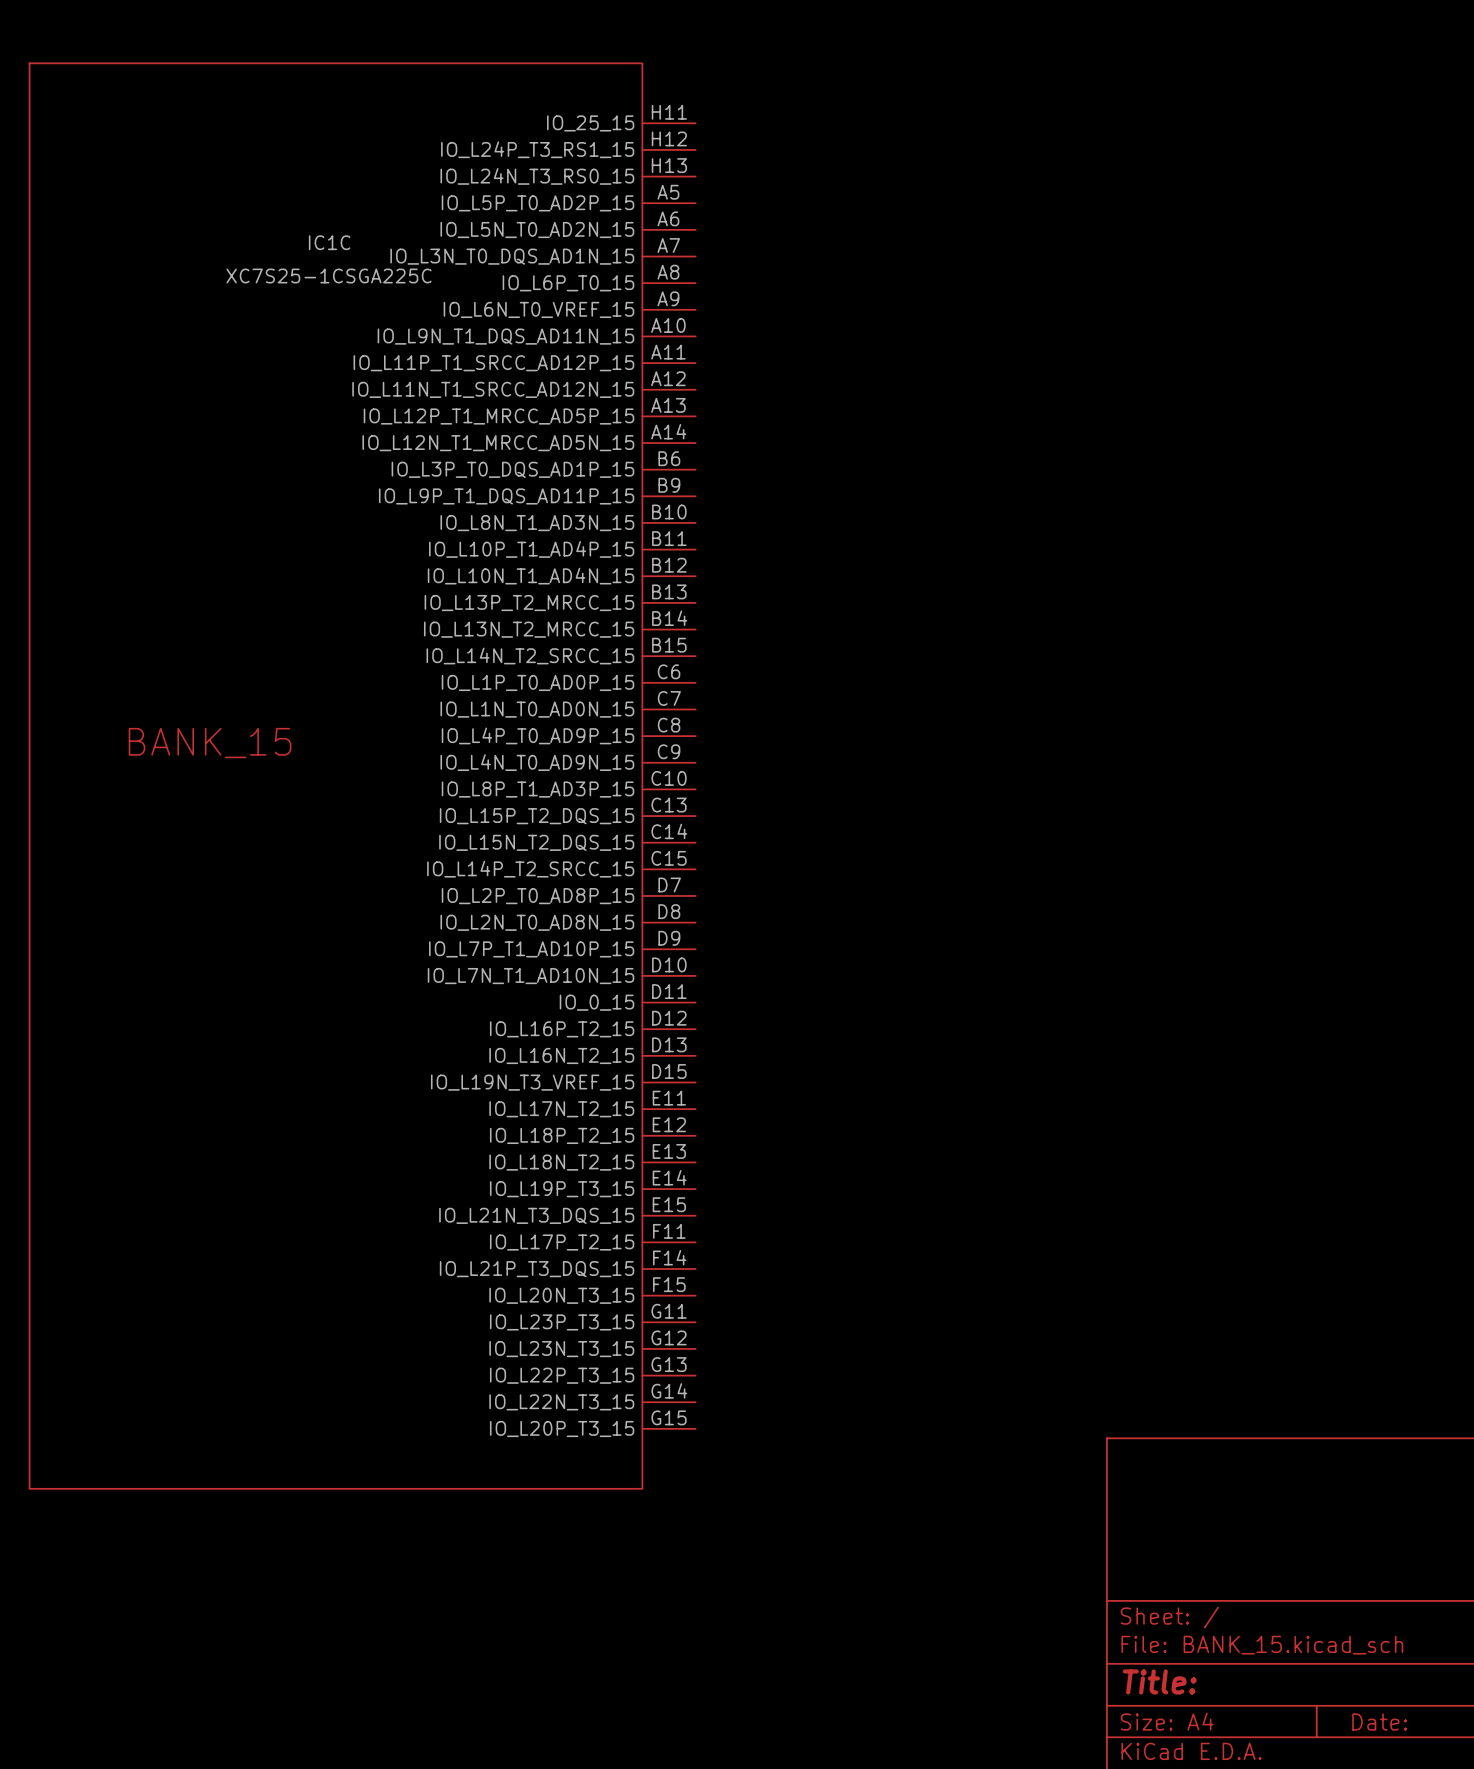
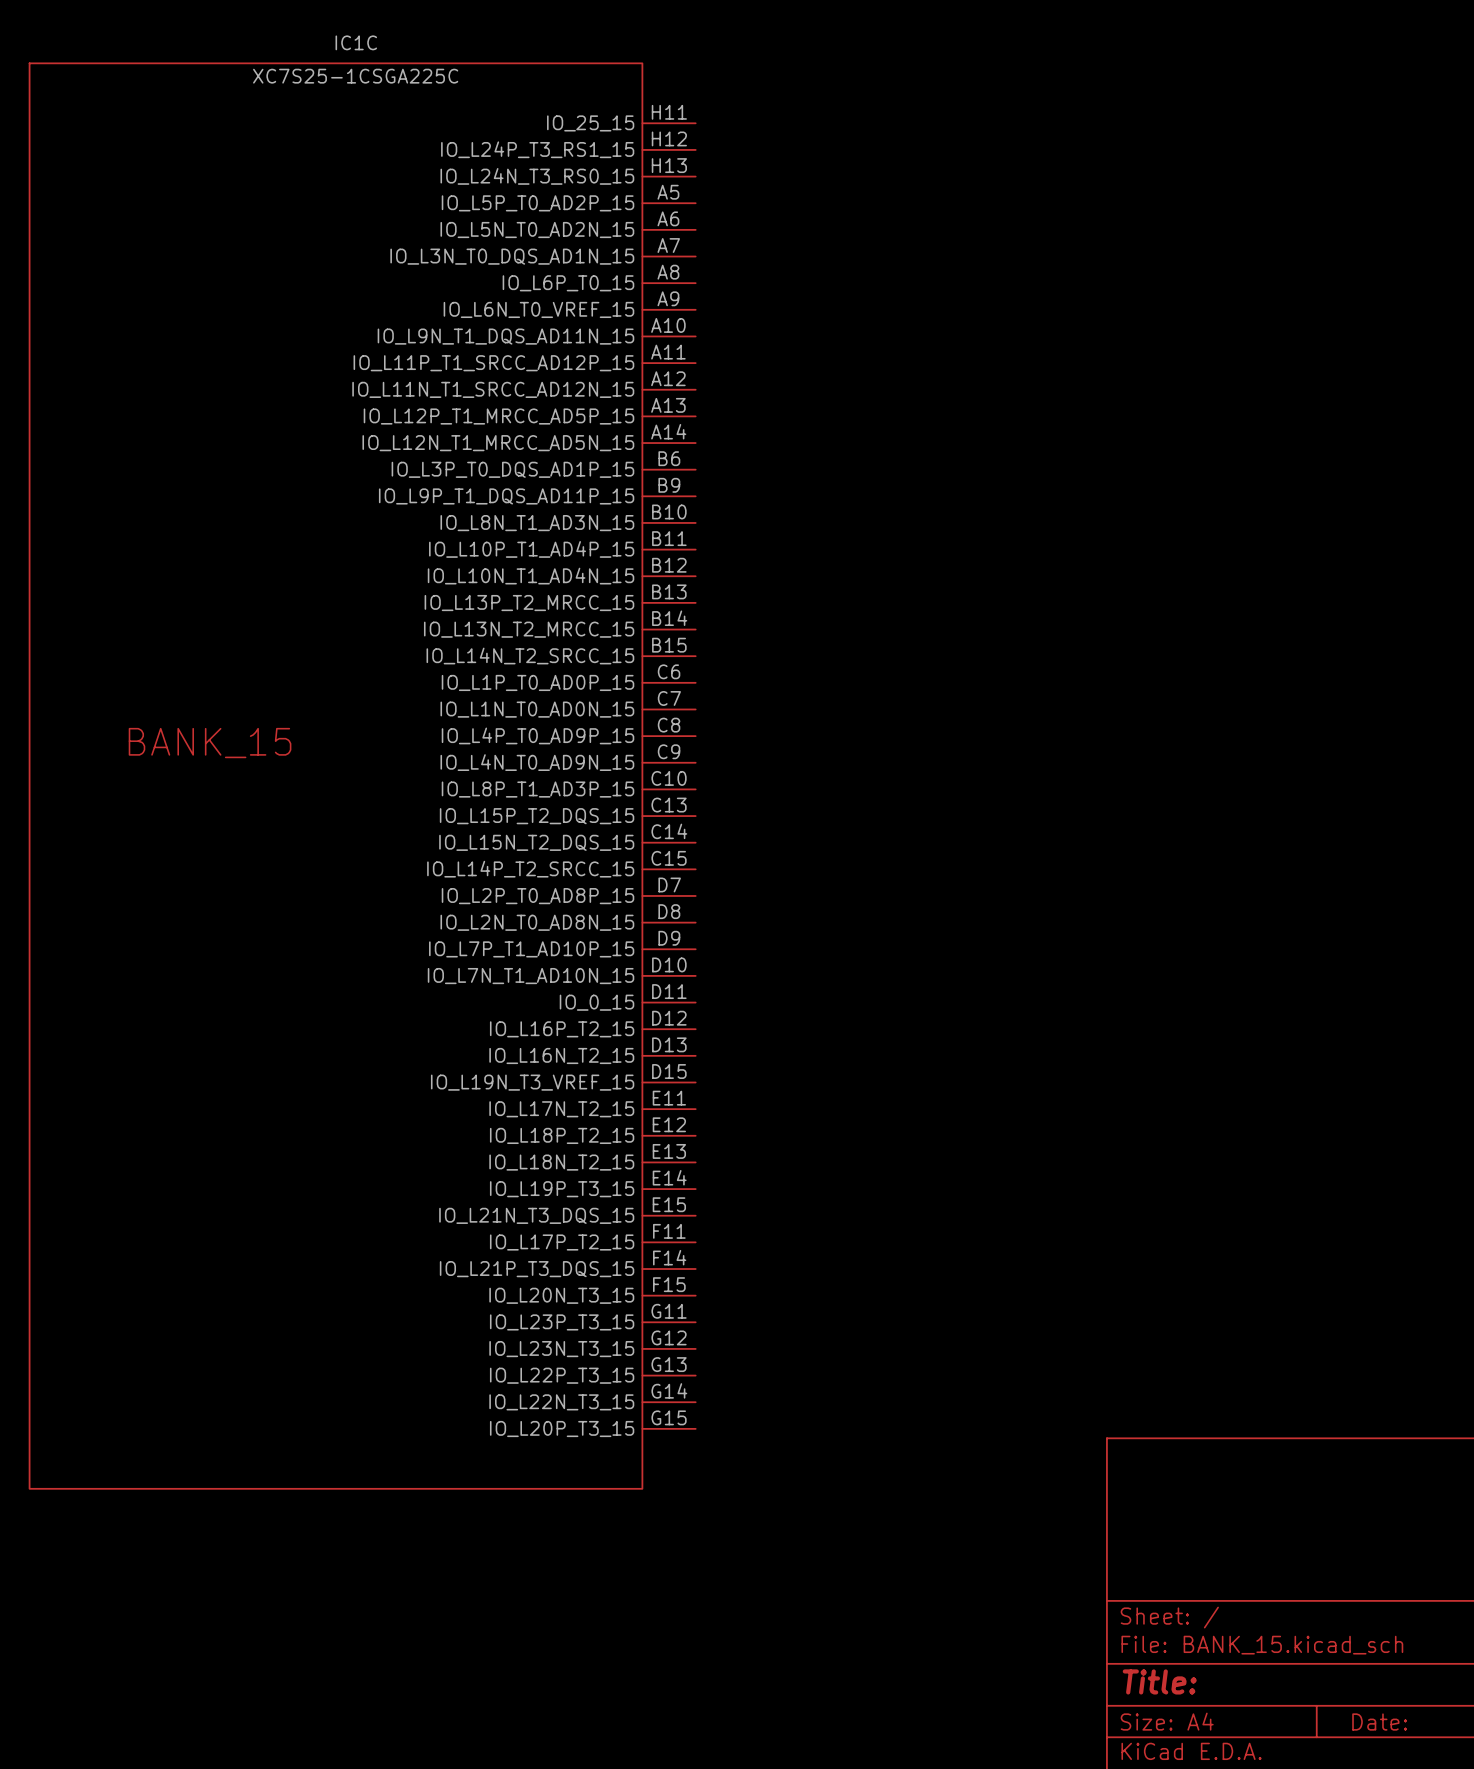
IC1C name position: IC1C (329, 242) -> IC1C (356, 42)
IC1C value position: XC7S25-1CSGA225C (329, 276) -> XC7S25-1CSGA225C (355, 76)

